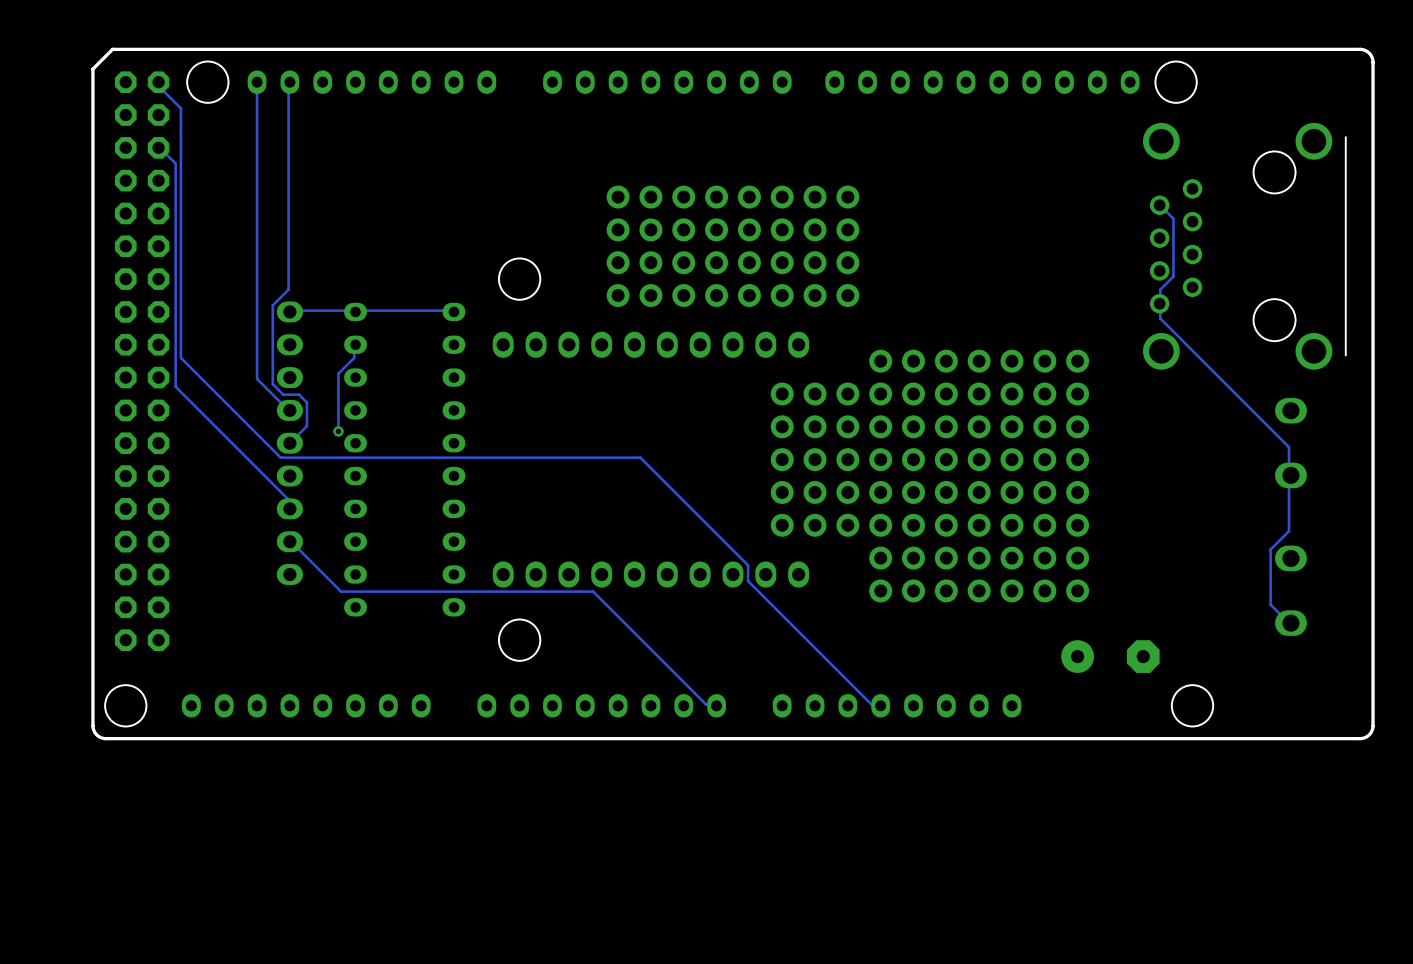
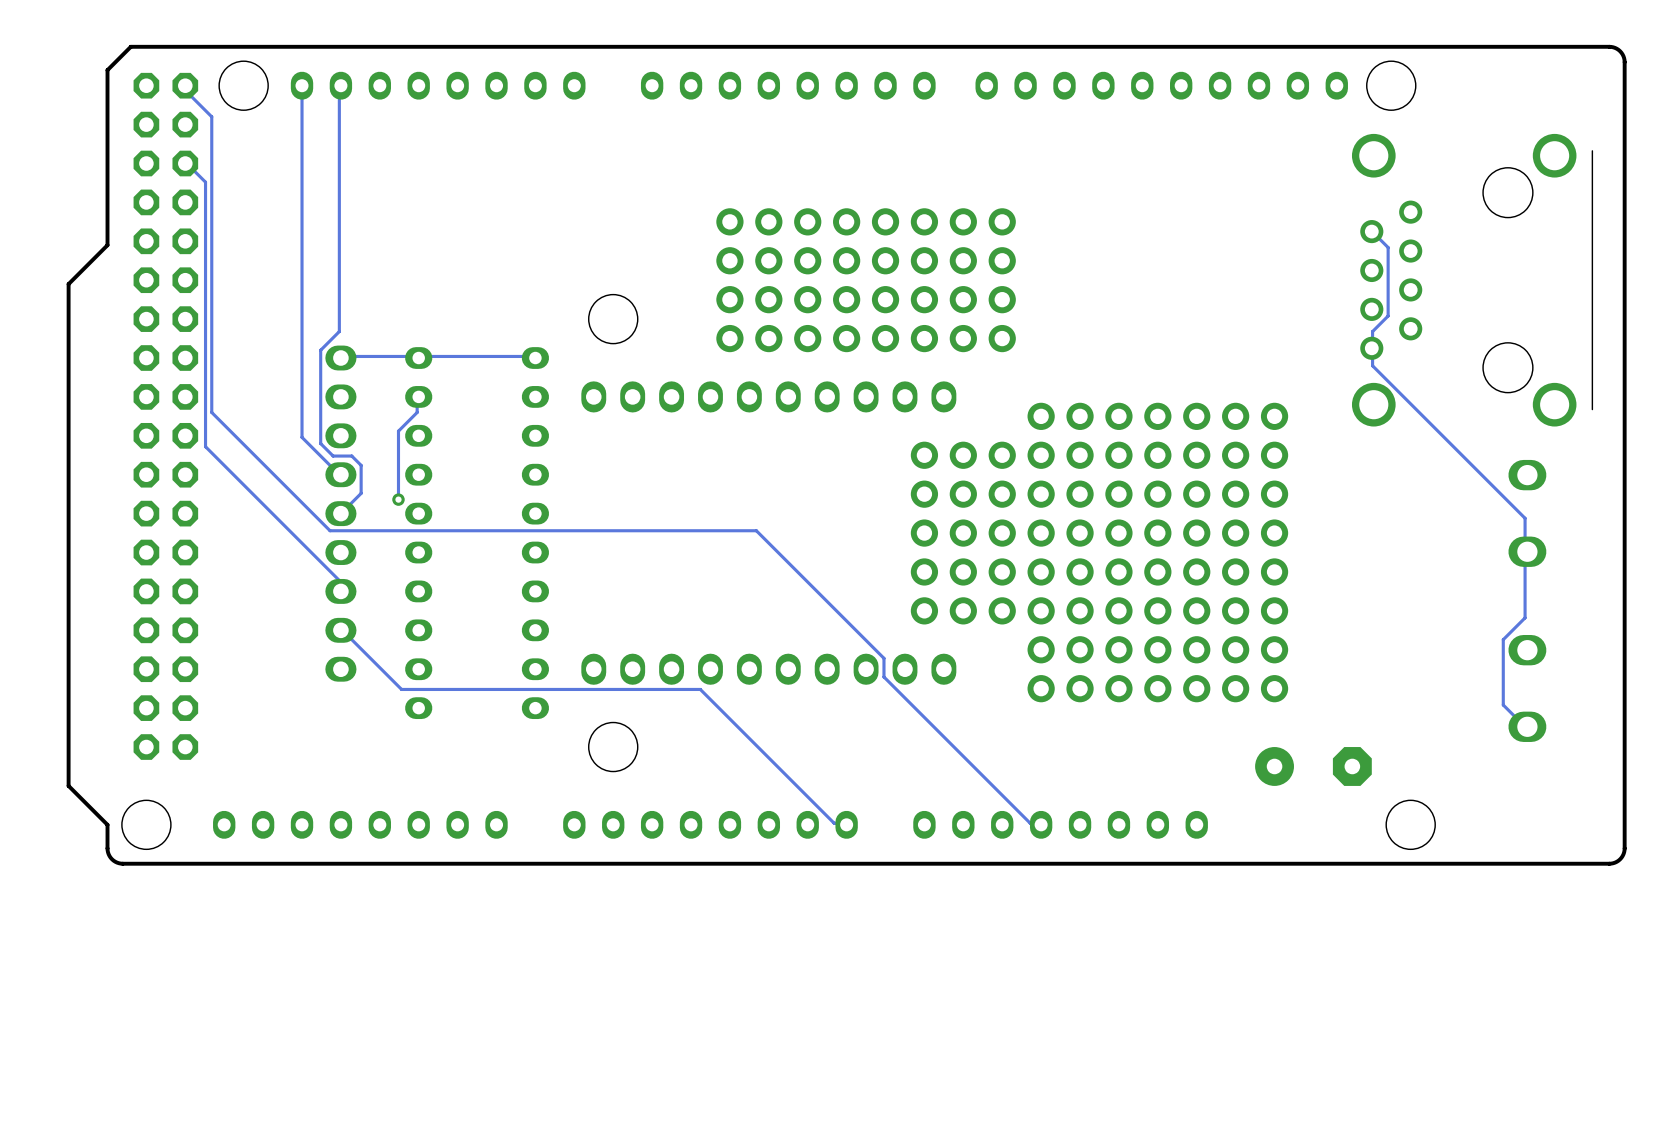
board edge: (92, 216) (92, 705) -> (107, 245) (68, 284) (68, 785) (107, 824)

